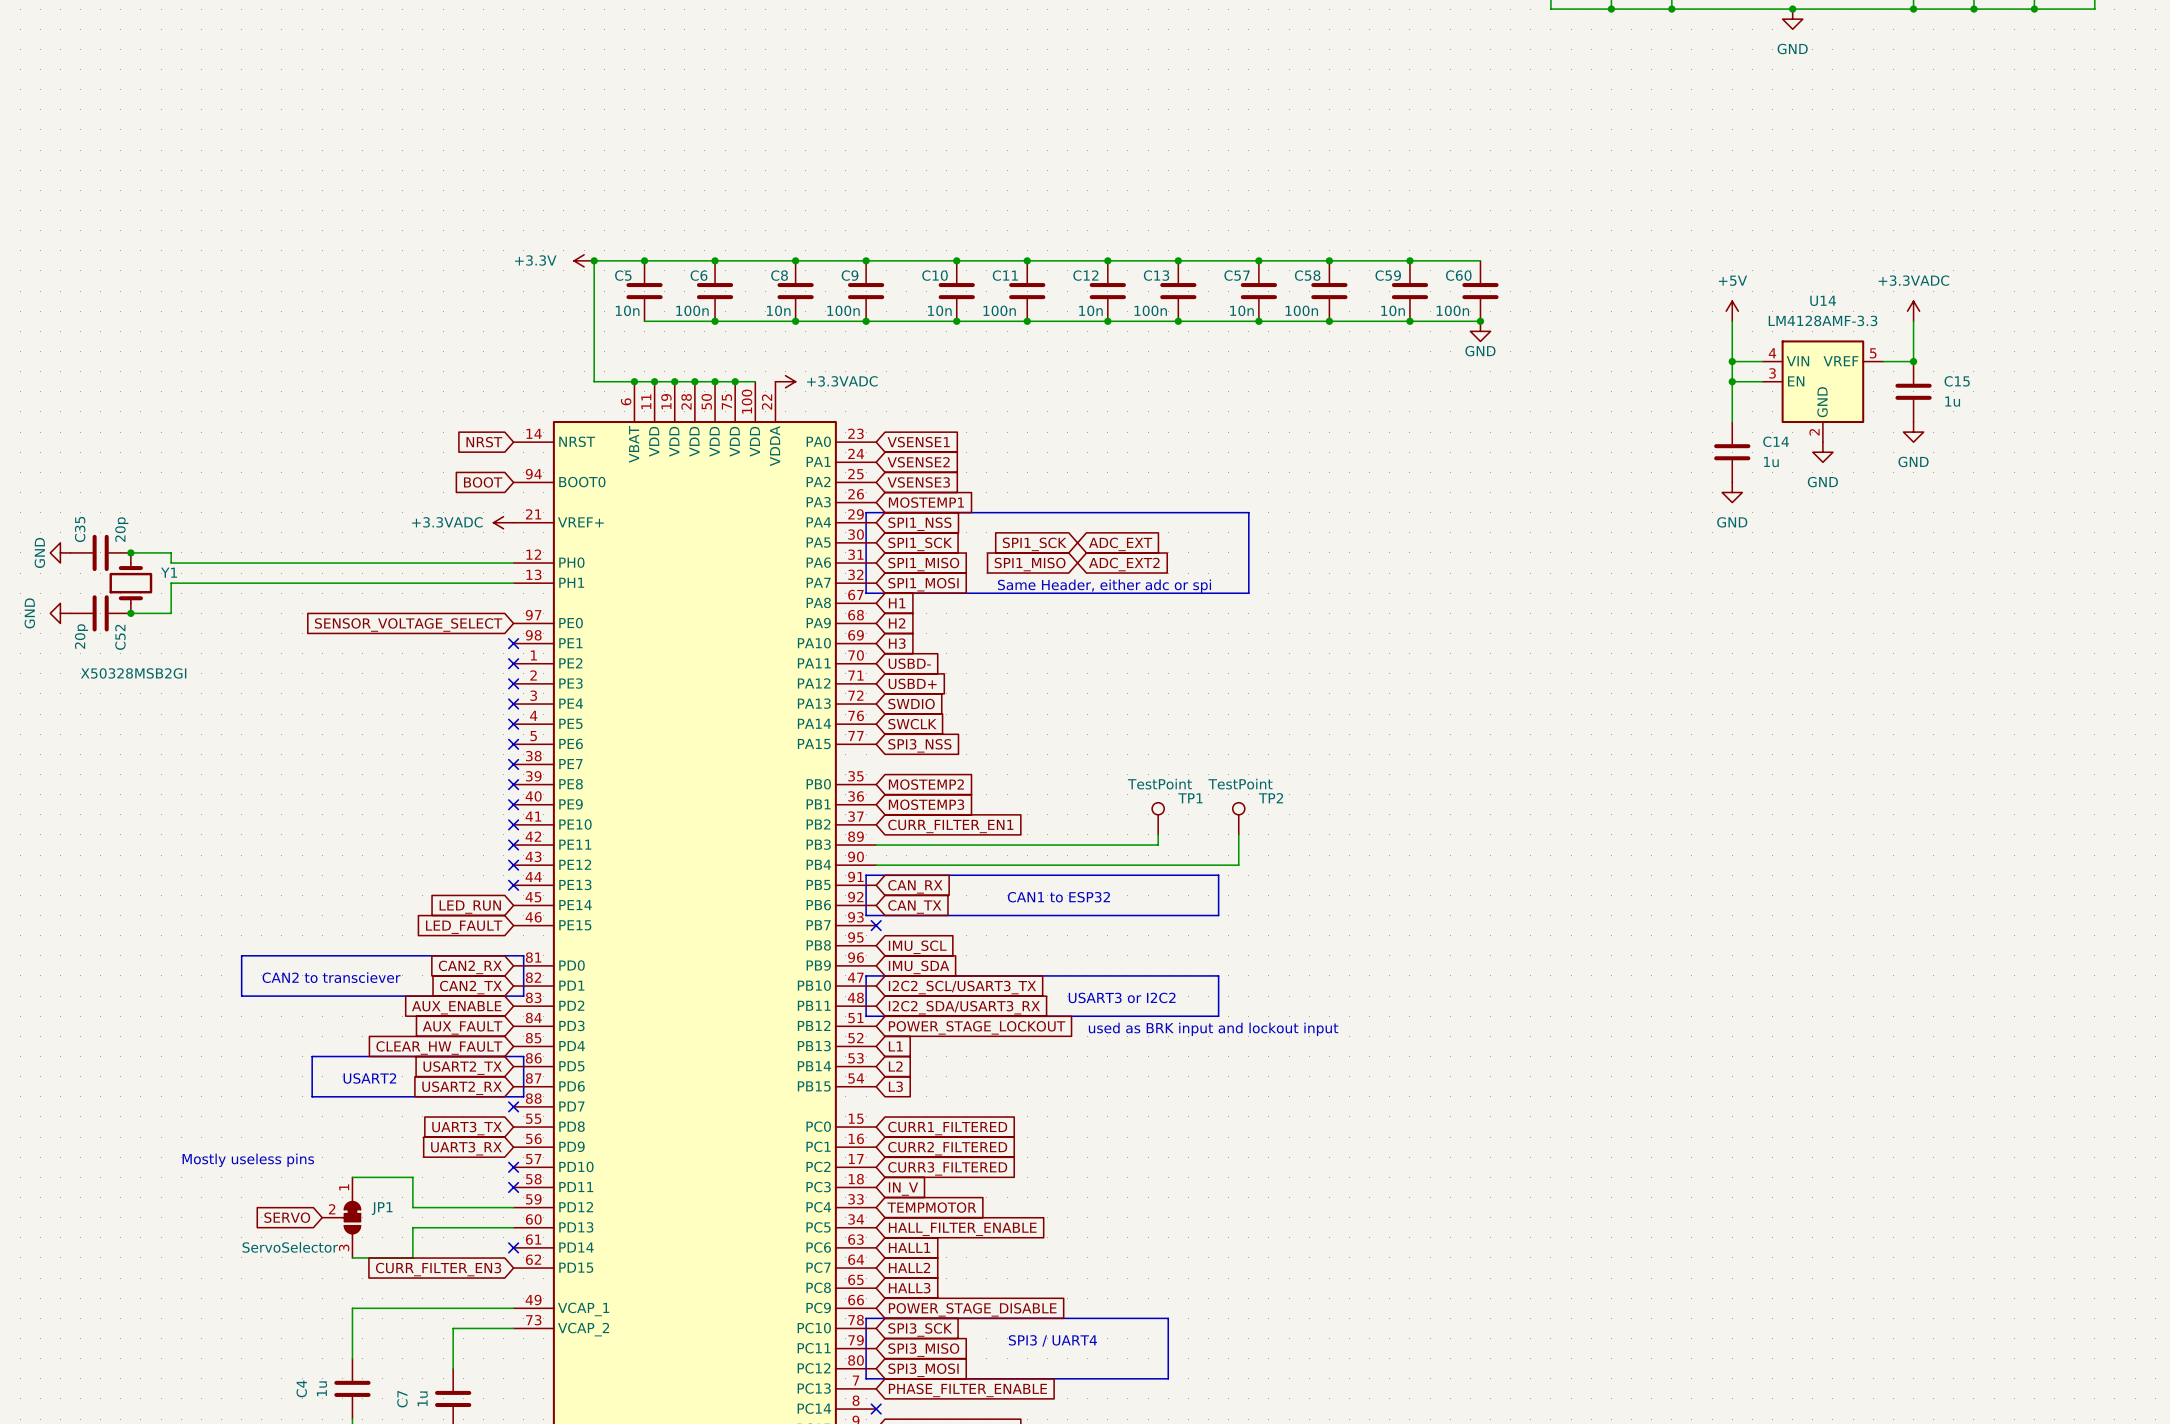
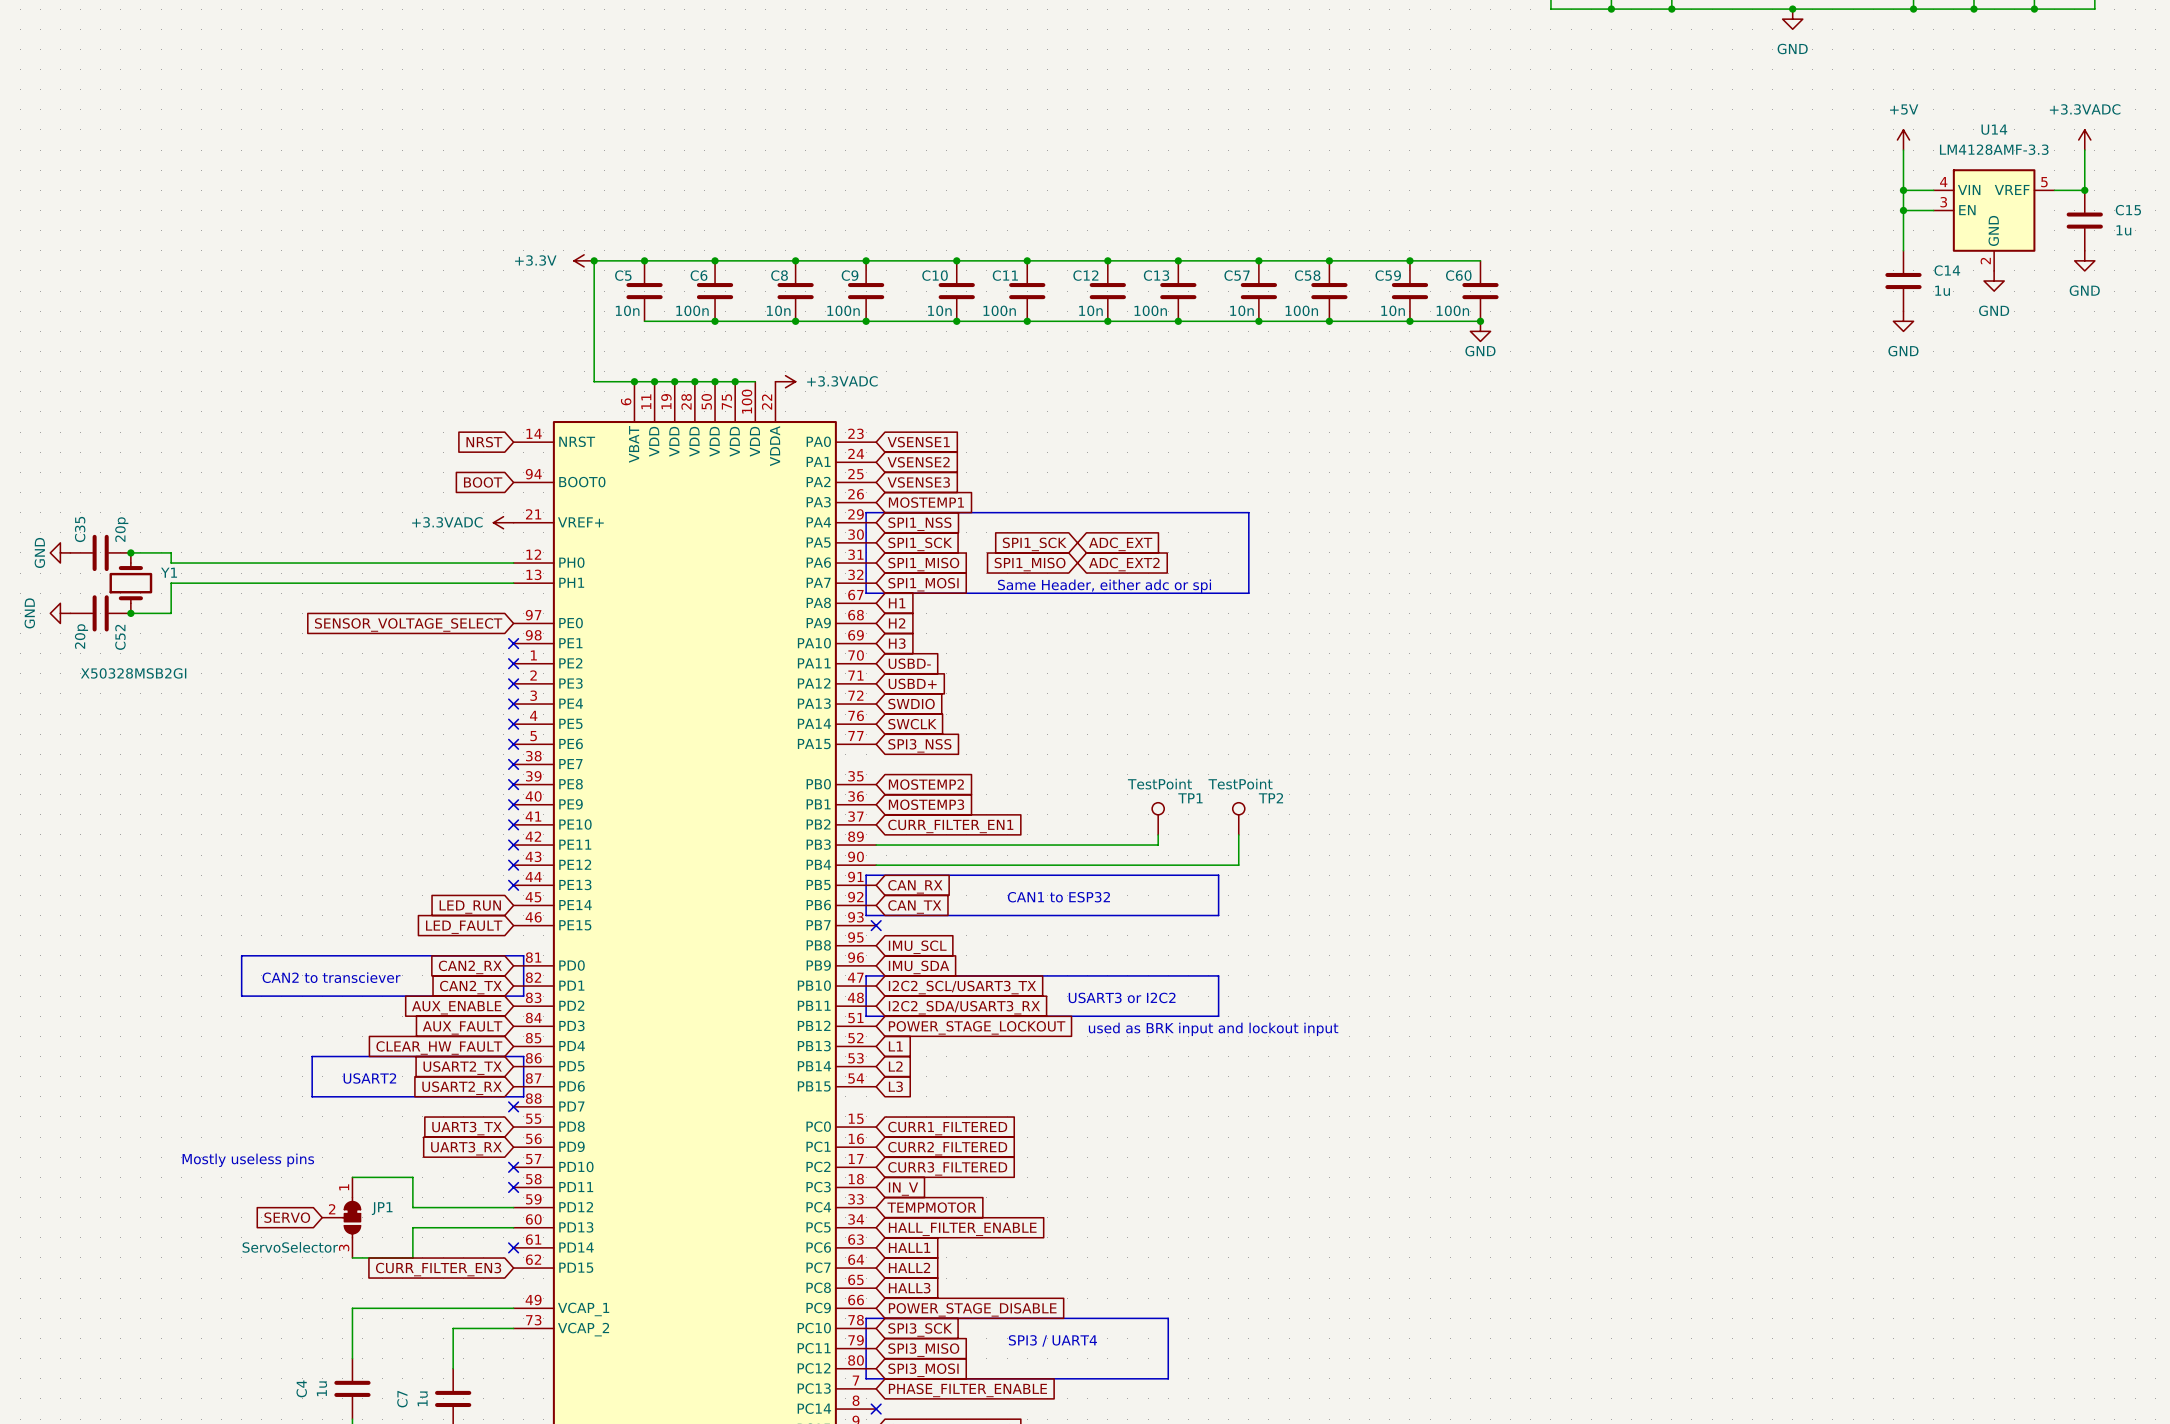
power symbol: none -> +5V (1903, 140)
power symbol: none -> +3.3VADC (2084, 140)
wire: none -> (1903, 150) (1903, 250)
wire: none -> (2084, 150) (2084, 190) (2054, 190)
wire: none -> (1903, 190) (1933, 190)
junction: none -> (1903, 190)
junction: none -> (2084, 190)
wire: none -> (1903, 210) (1933, 210)
junction: none -> (1903, 210)
power symbol: none -> GND (2084, 260)
power symbol: none -> GND (1994, 281)
power symbol: +5V (1732, 311) -> none
power symbol: +3.3VADC (1913, 311) -> none
wire: (1732, 321) (1732, 422) -> none
power symbol: none -> GND (1903, 321)
wire: (1913, 321) (1913, 361) (1883, 361) -> none
wire: (1732, 361) (1762, 361) -> none
junction: (1732, 361) -> none
junction: (1913, 361) -> none
wire: (1732, 381) (1762, 381) -> none
junction: (1732, 381) -> none
U14 position: (1822, 391) -> (1994, 220)
C15 position: (1913, 391) -> (2084, 220)
power symbol: GND (1913, 432) -> none
C14 position: (1732, 452) -> (1903, 281)
power symbol: GND (1822, 452) -> none
power symbol: GND (1732, 492) -> none

